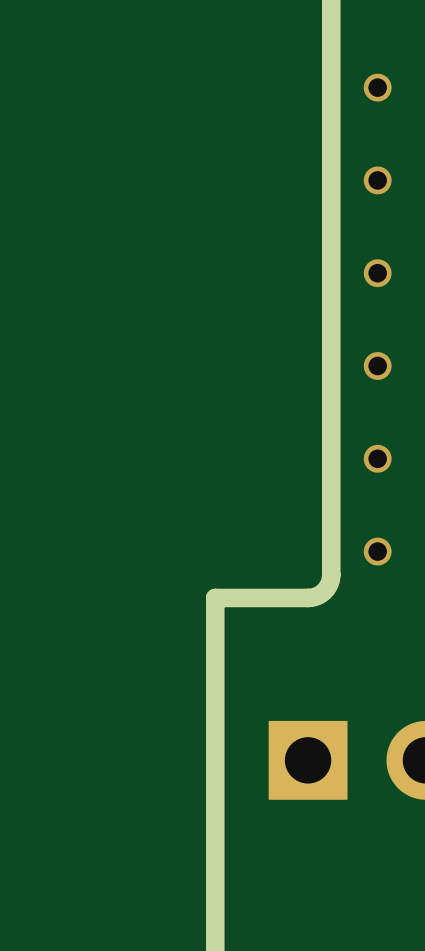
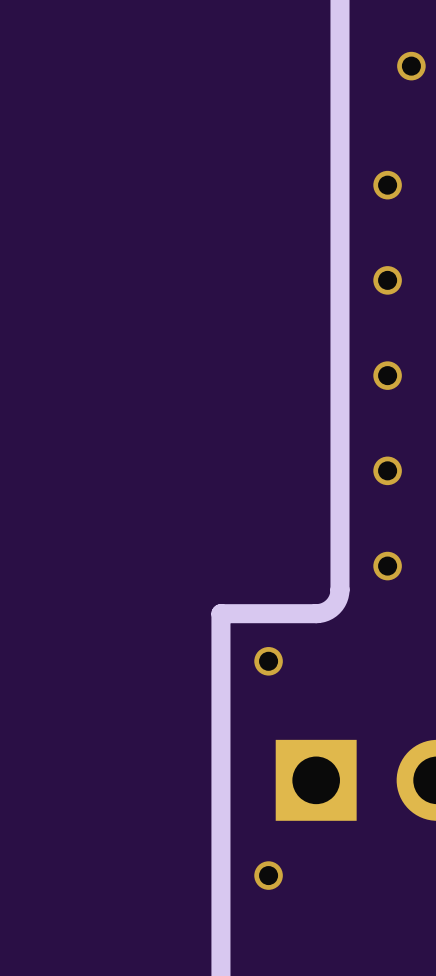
via position: (377, 87) -> (411, 66)
via: none -> (268, 661)
via: none -> (268, 875)

